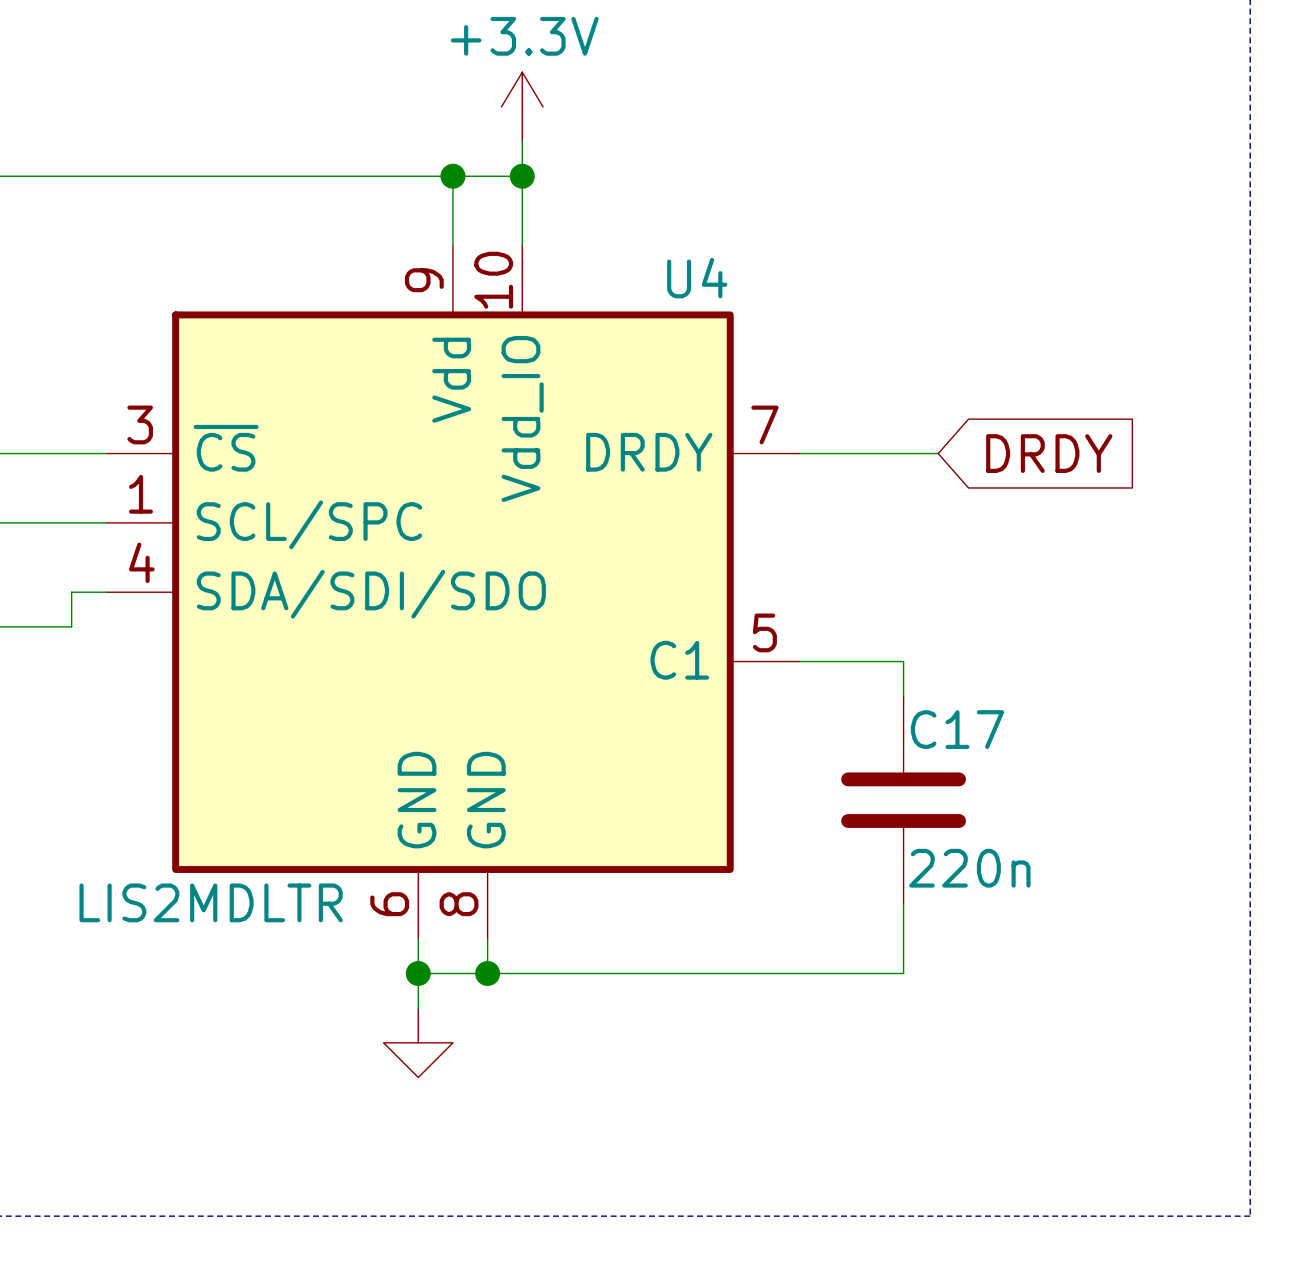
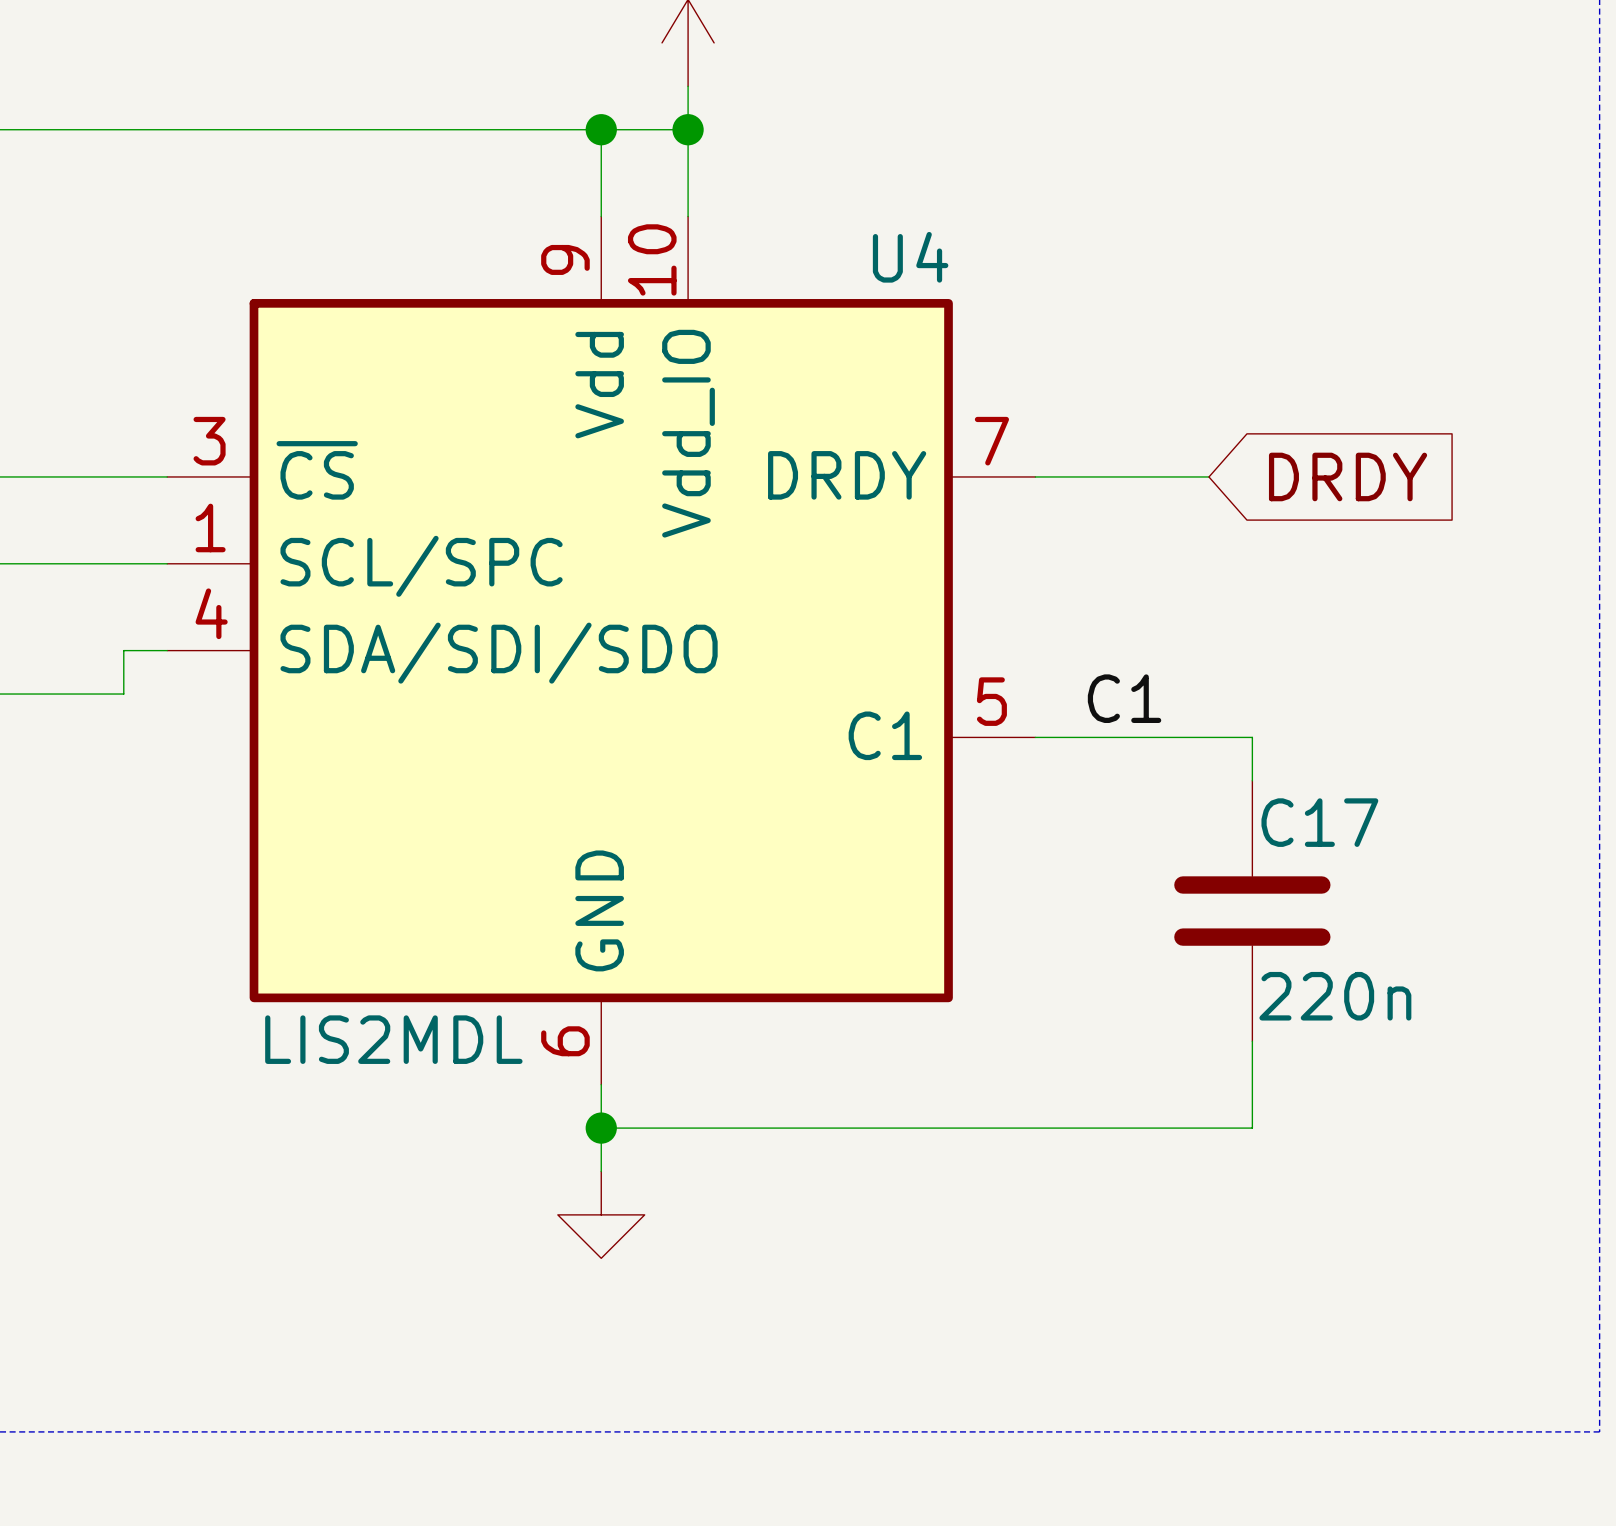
U4 symbol: [106, 245, 800, 939] -> [167, 216, 1036, 1085]
label: none -> C1 (1124, 698)
wire: (903, 661) (903, 696) -> (1165, 737) (1252, 737) (1252, 780)
C17 position: (903, 800) -> (1252, 911)
U4 value: LIS2MDLTR (211, 902) -> LIS2MDL (393, 1039)
wire: (903, 904) (903, 973) -> (1252, 1041) (1252, 1128) (1165, 1128)
wire: (418, 938) (418, 1008) -> (601, 1084) (601, 1171)
wire: (487, 938) (487, 973) -> none
wire: (418, 973) (452, 973) -> none
junction: (418, 973) -> none
junction: none -> (601, 1128)
junction: (487, 973) -> none
power symbol position: (418, 1042) -> (601, 1214)

